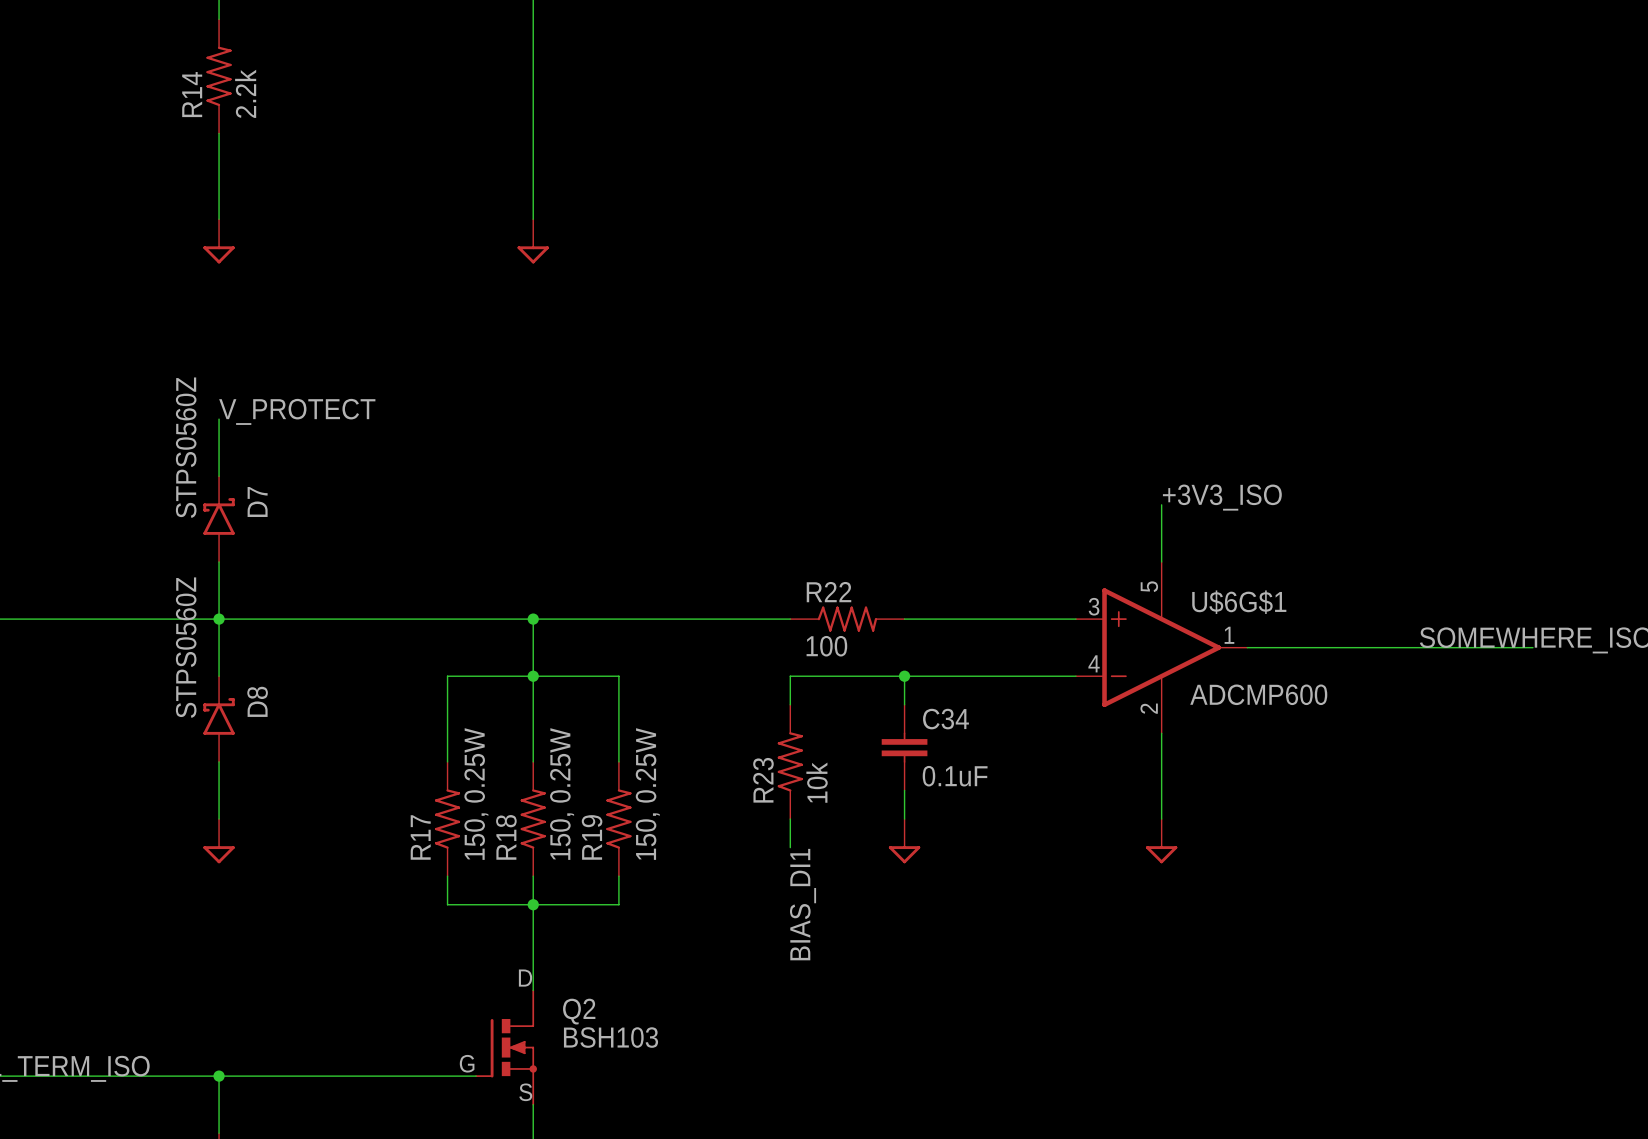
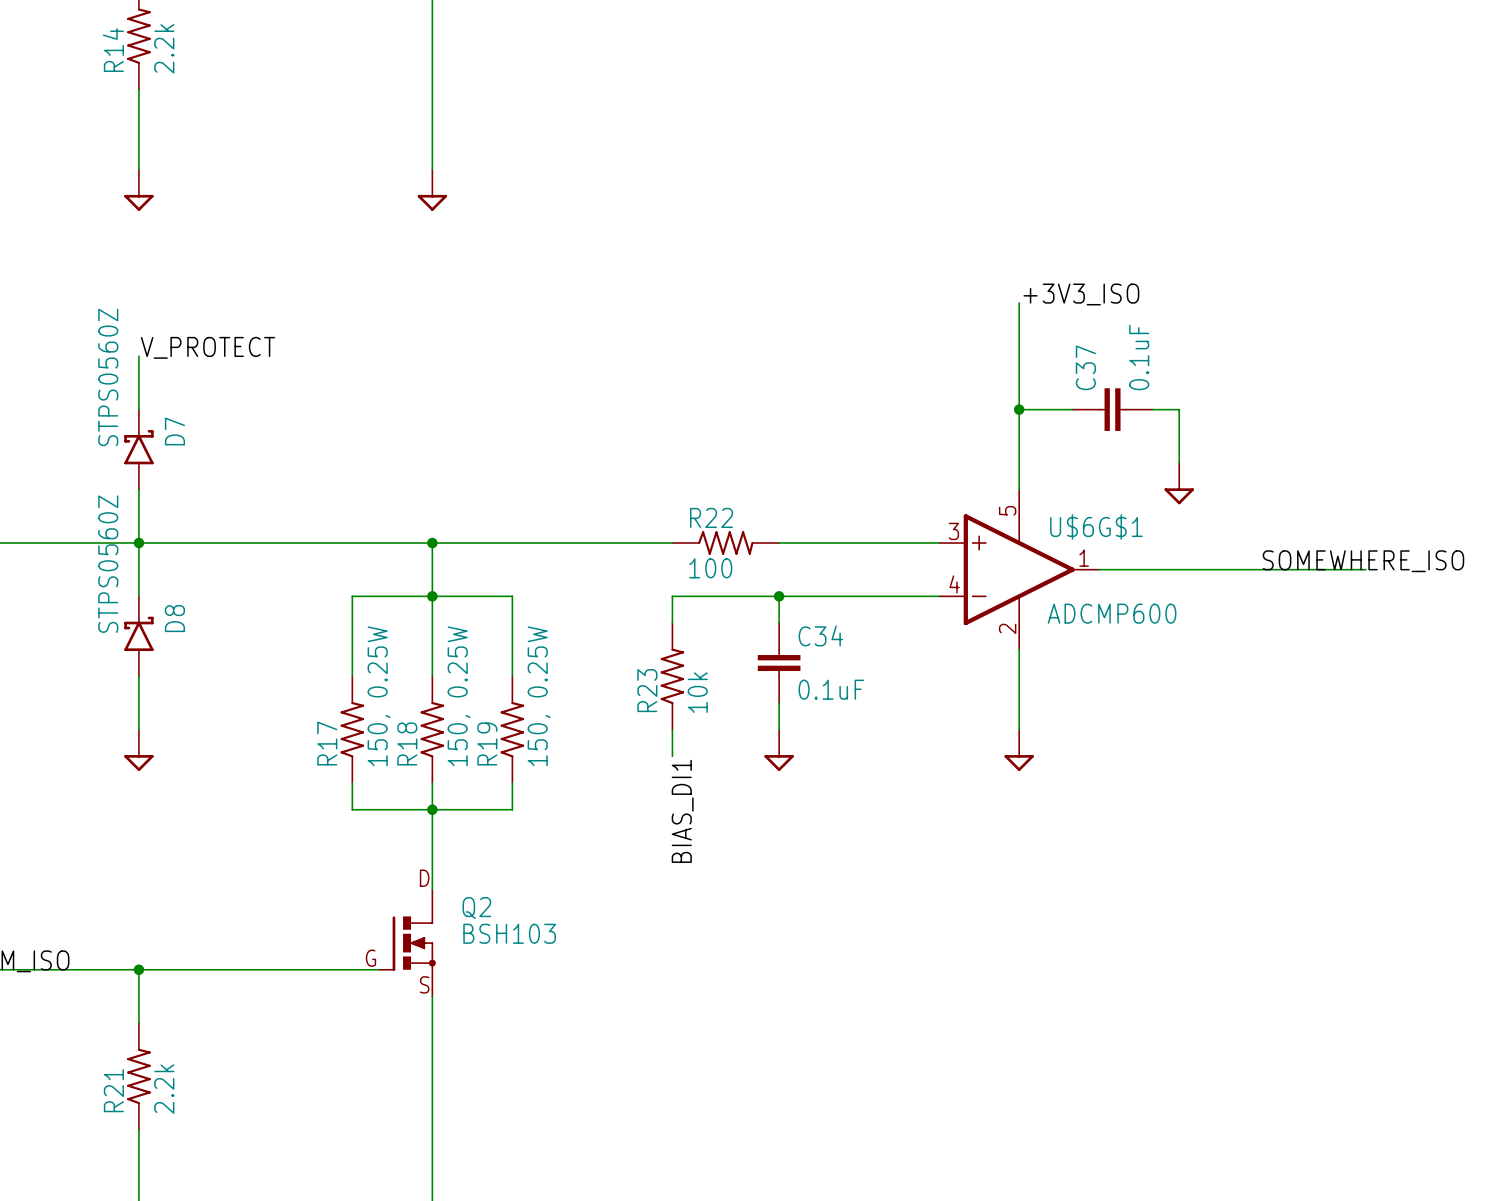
wire: none -> (1019, 302) (1019, 436)
wire: none -> (1019, 409) (1072, 409)
junction: none -> (1019, 409)
C37: none -> 0.1uF (1112, 409)
wire: none -> (1152, 409) (1179, 409) (1179, 462)
label position: +3V3_ISO (1222, 497) -> +3V3_ISO (1081, 294)
power symbol: none -> (1179, 483)

